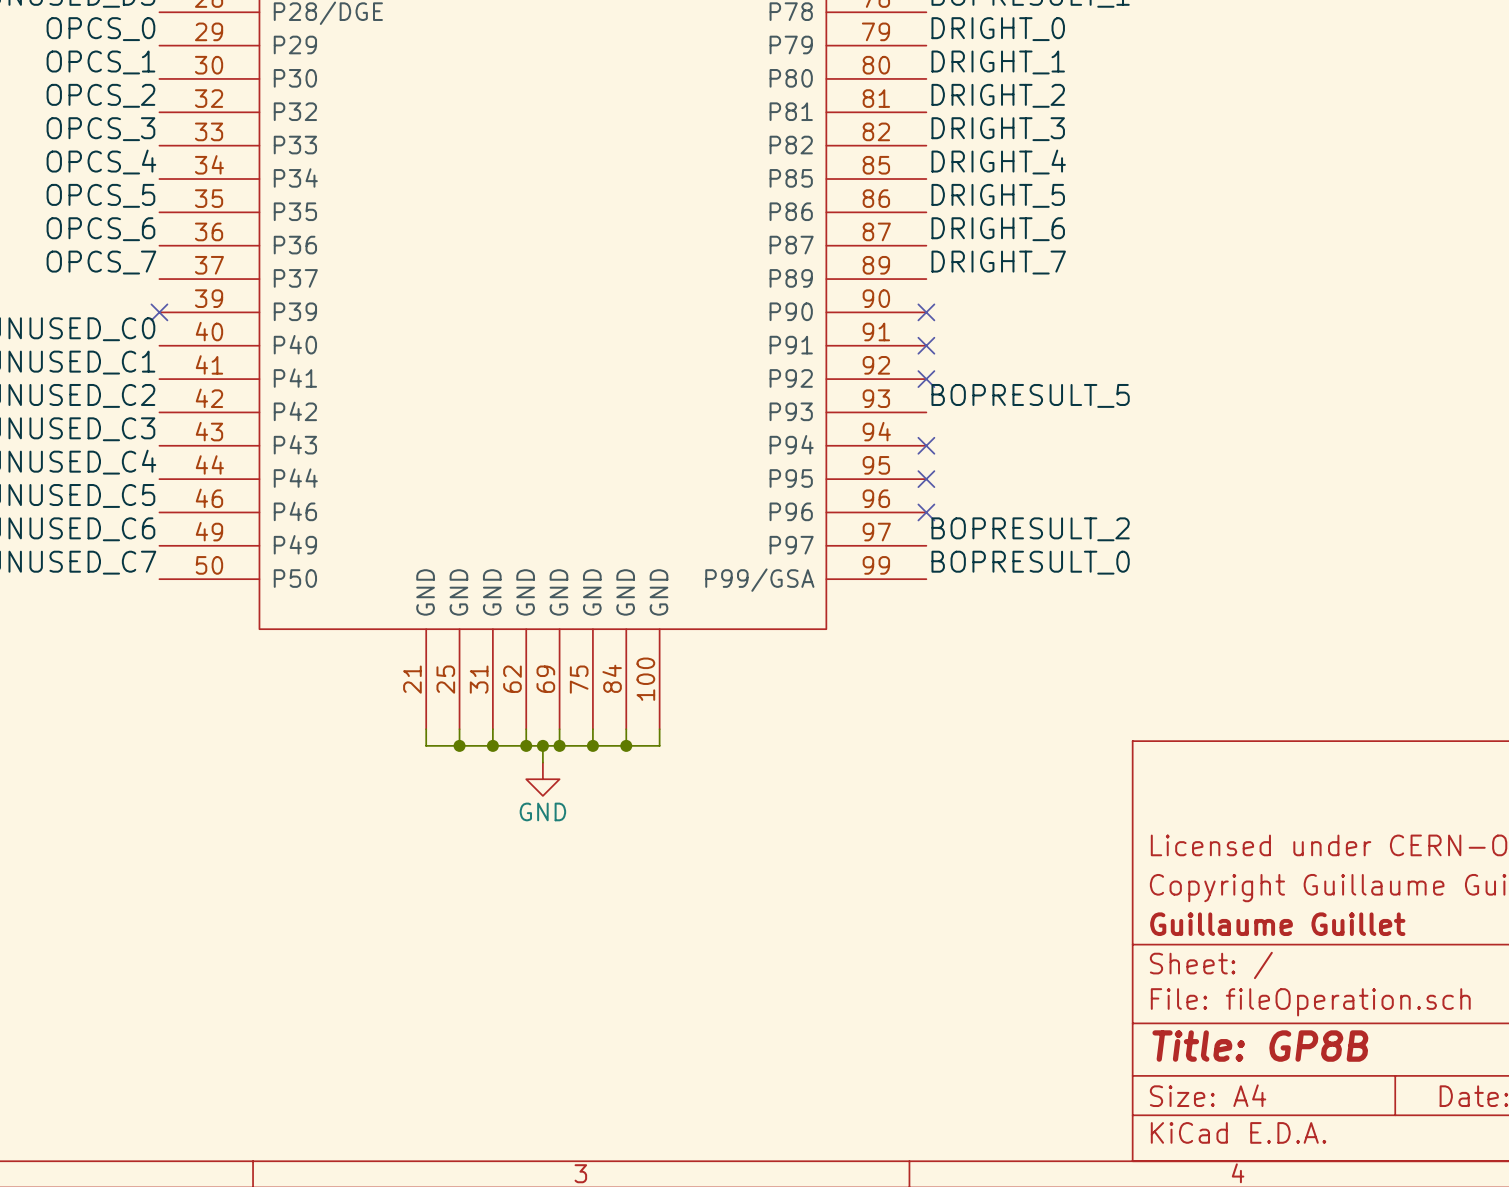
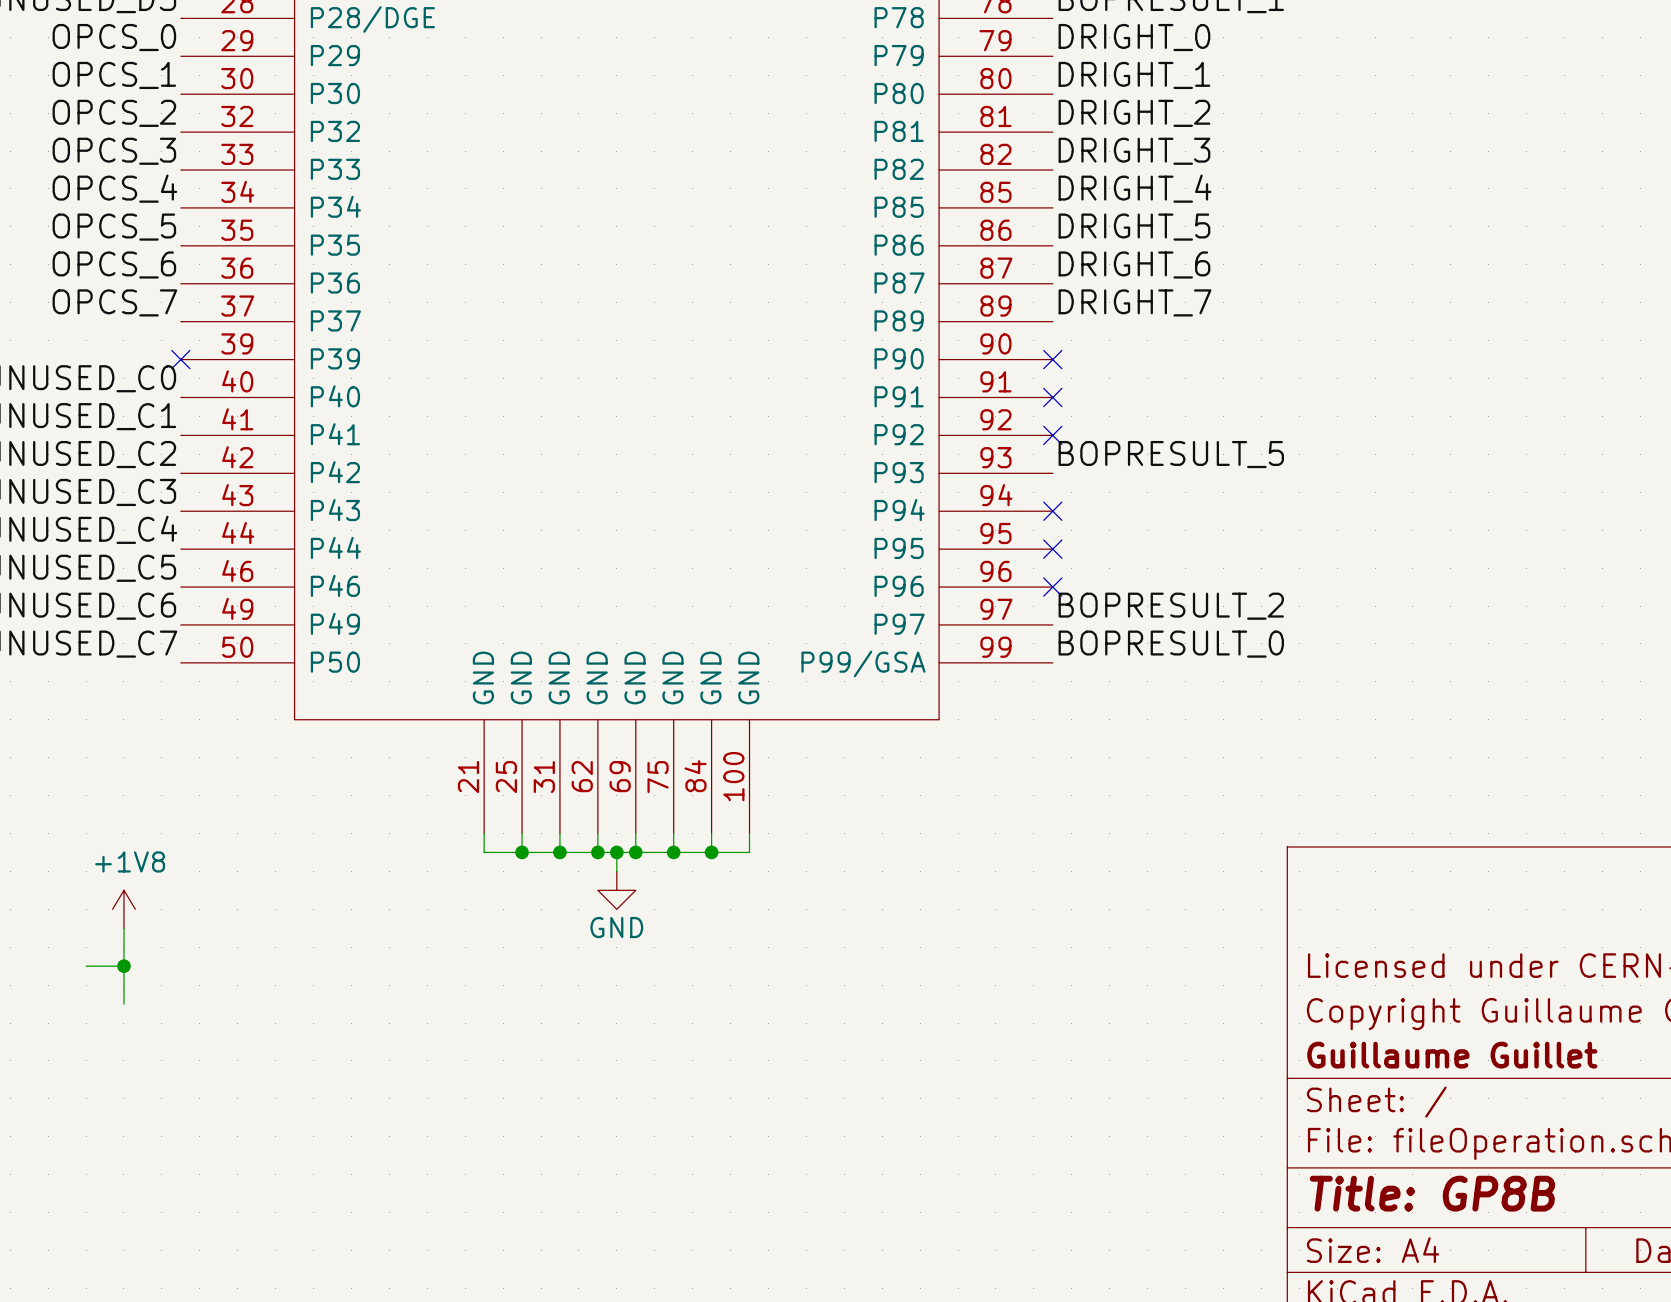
power symbol: none -> +1V8 (123, 909)
wire: none -> (123, 928) (123, 1004)
wire: none -> (86, 966) (123, 966)
junction: none -> (123, 966)

